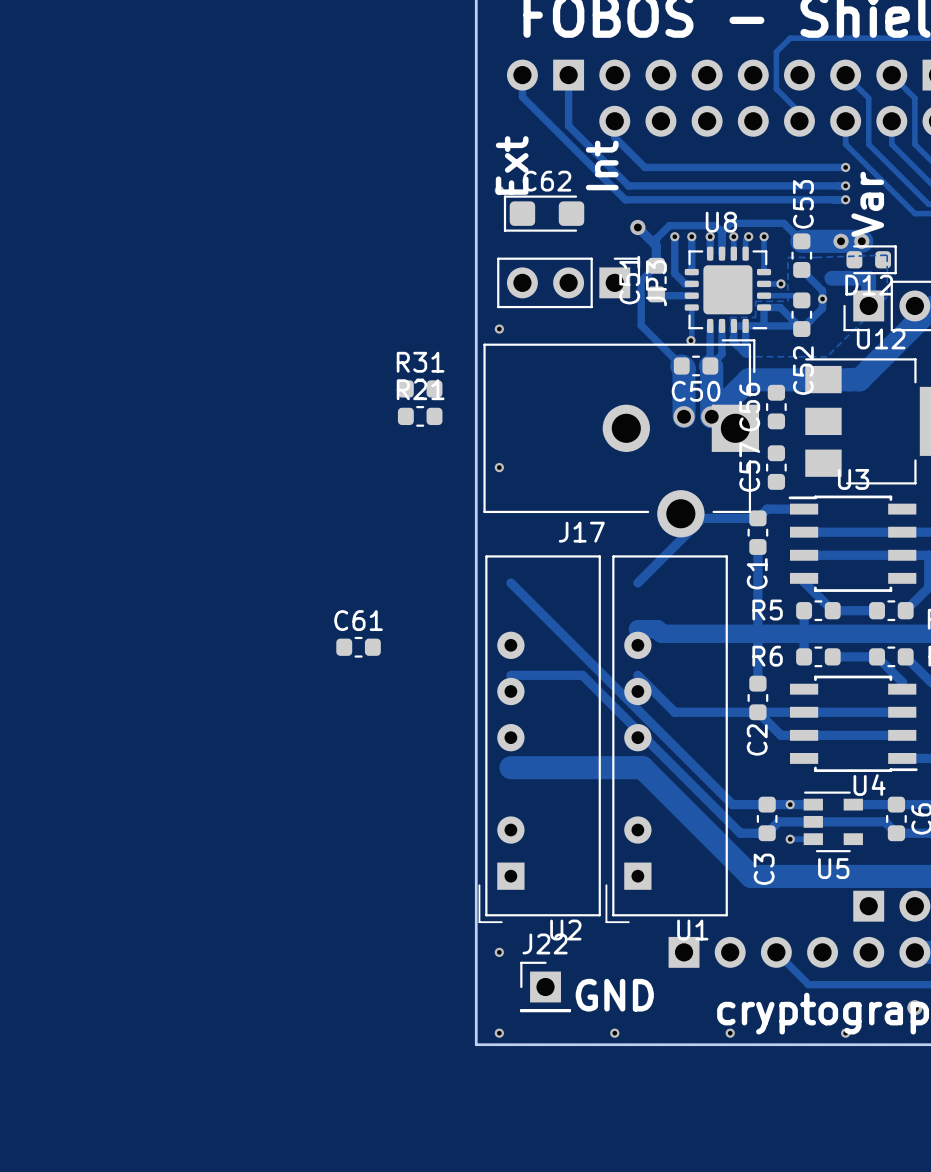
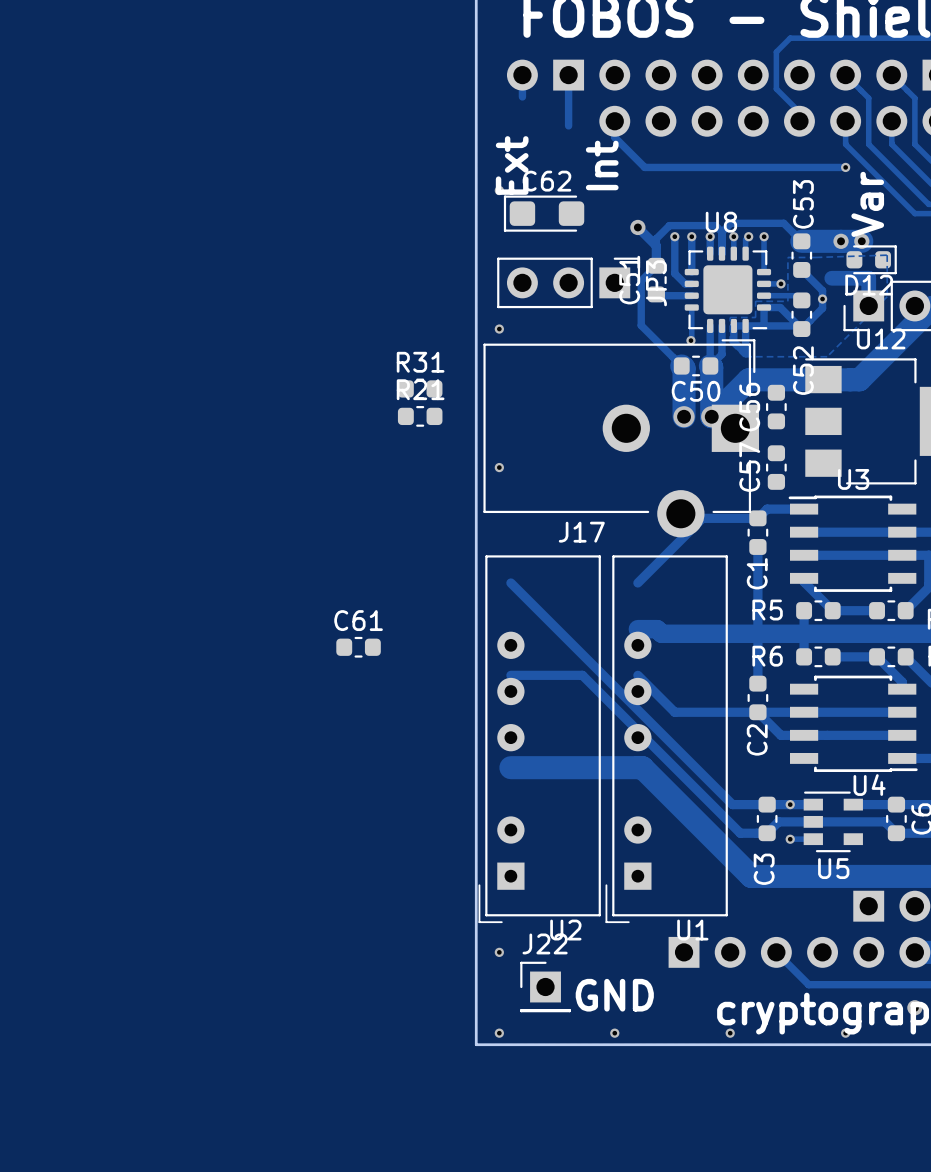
track: (522, 96) (625, 199) (845, 199) -> none
track: (568, 125) (628, 185) (845, 185) -> none
via: (845, 185) -> none
via: (845, 199) -> none

